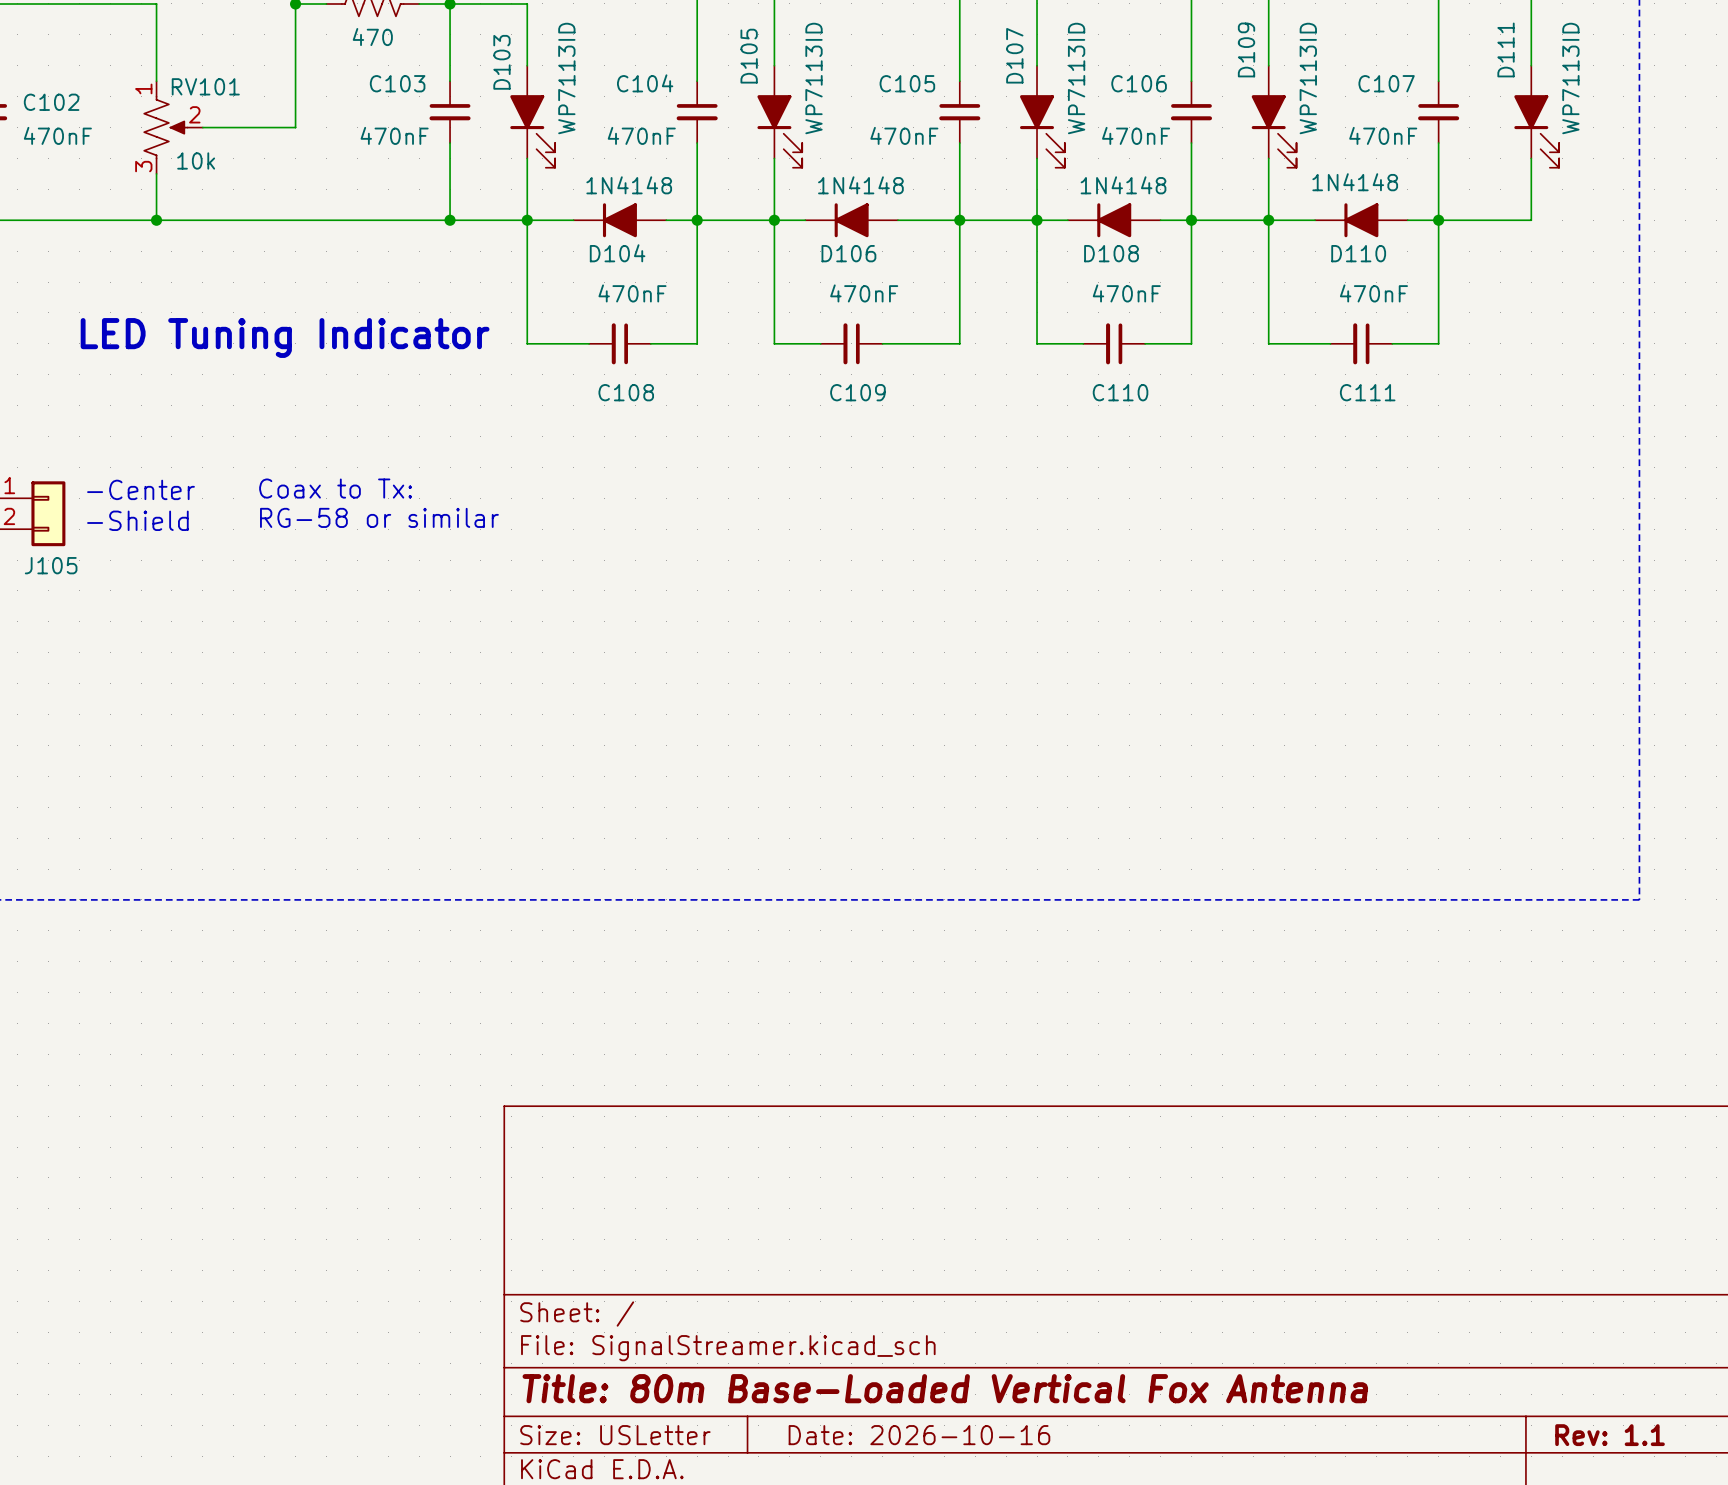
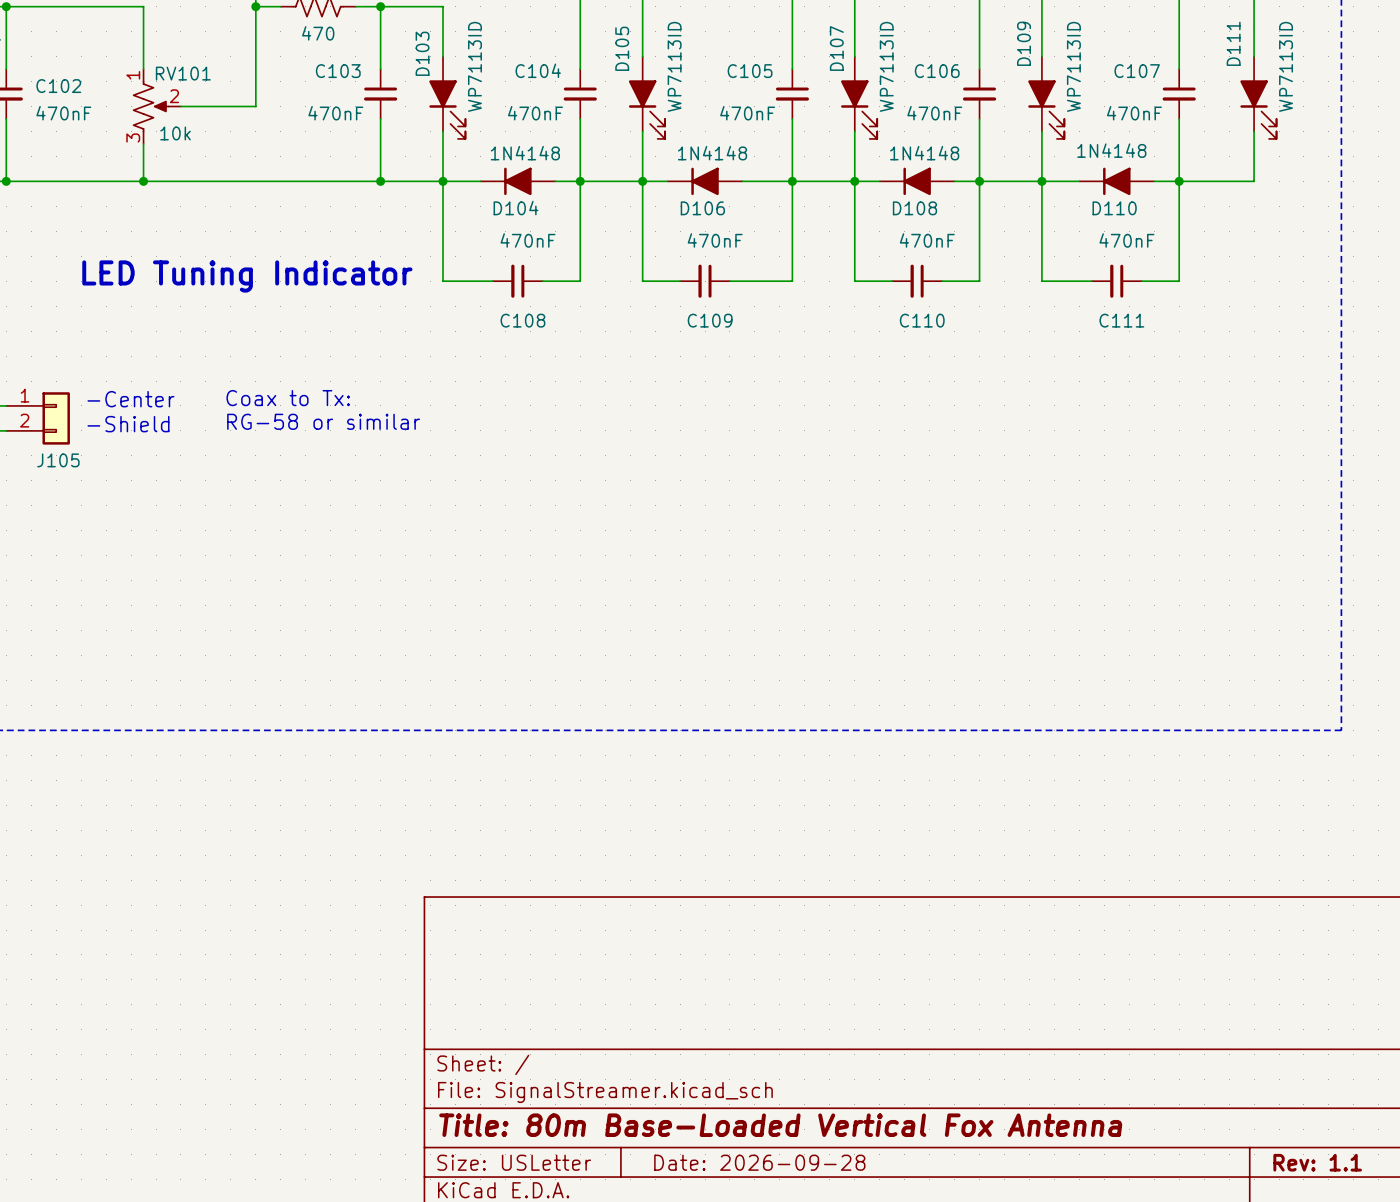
title block: Date: 2026-10-16 (919, 1435) -> Date: 2026-09-28 (759, 1162)

